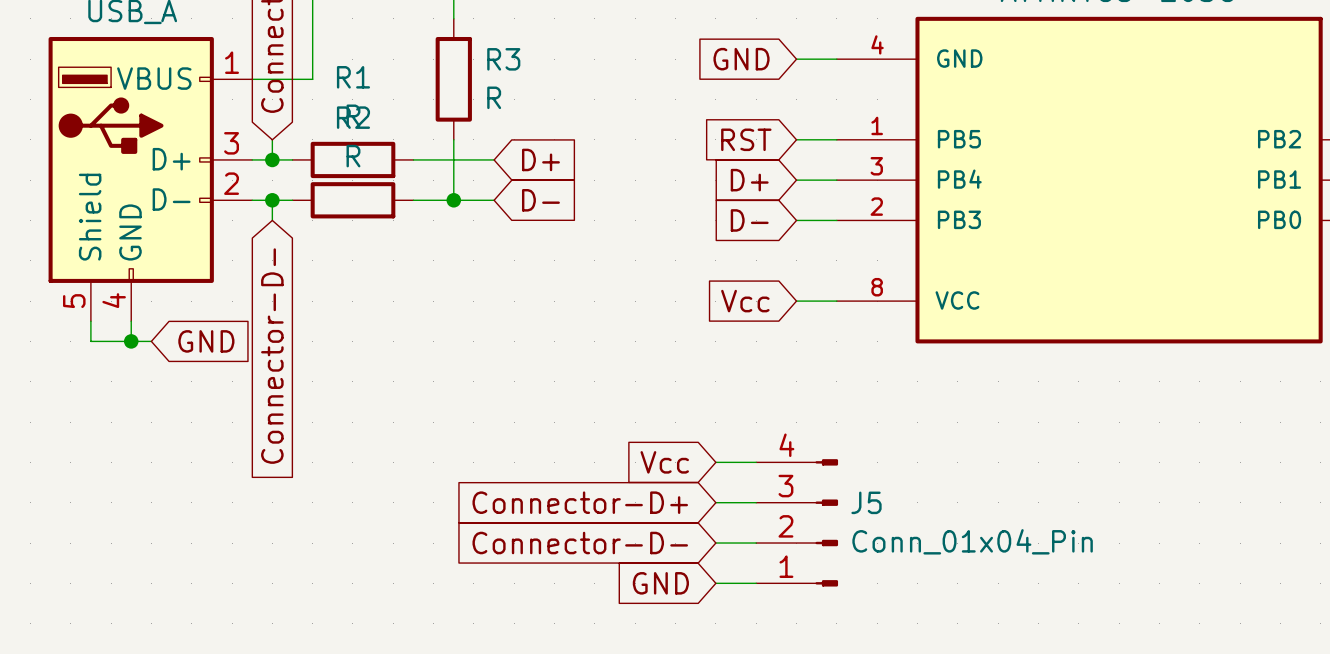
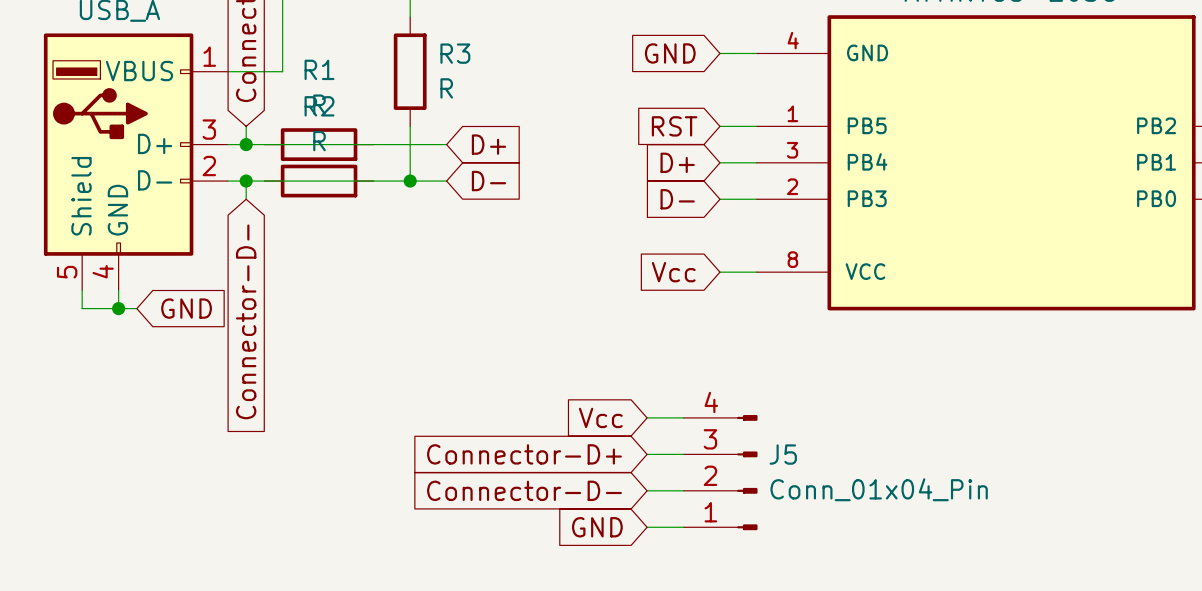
wire: none -> (264, 144) (373, 144)
wire: none -> (264, 181) (373, 181)

